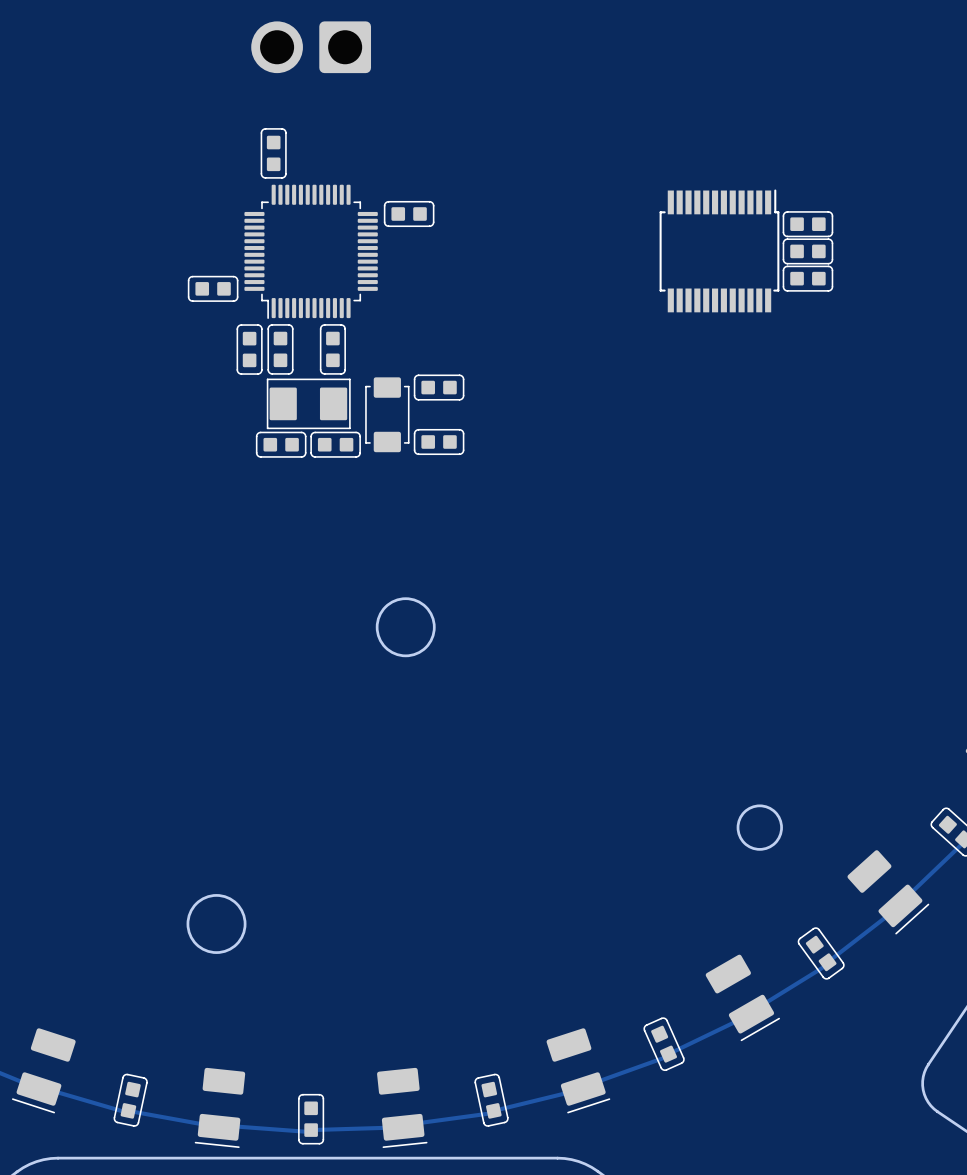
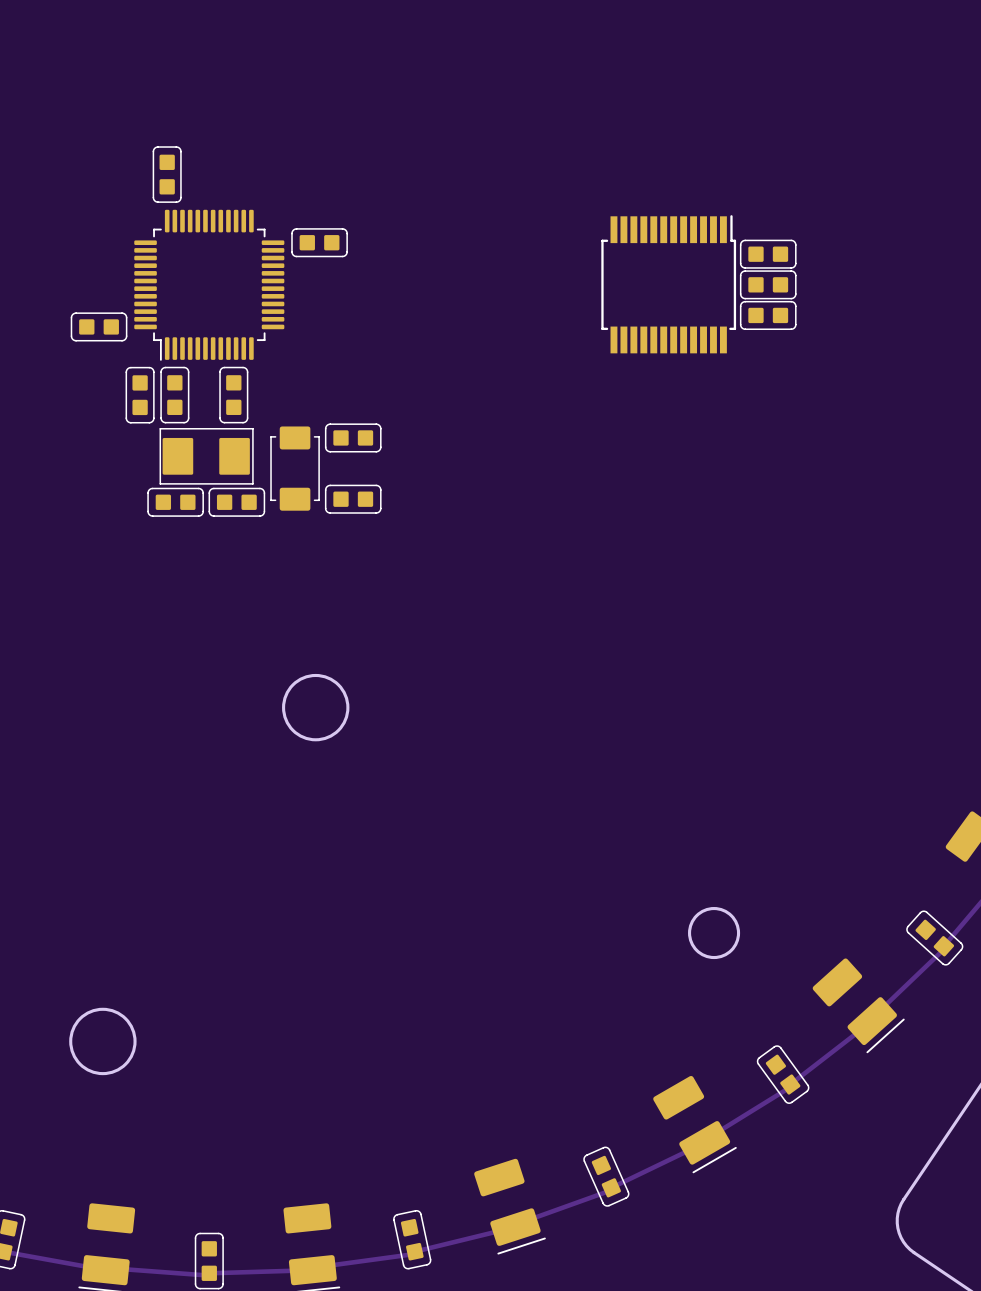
part: (311, 47) -> none

